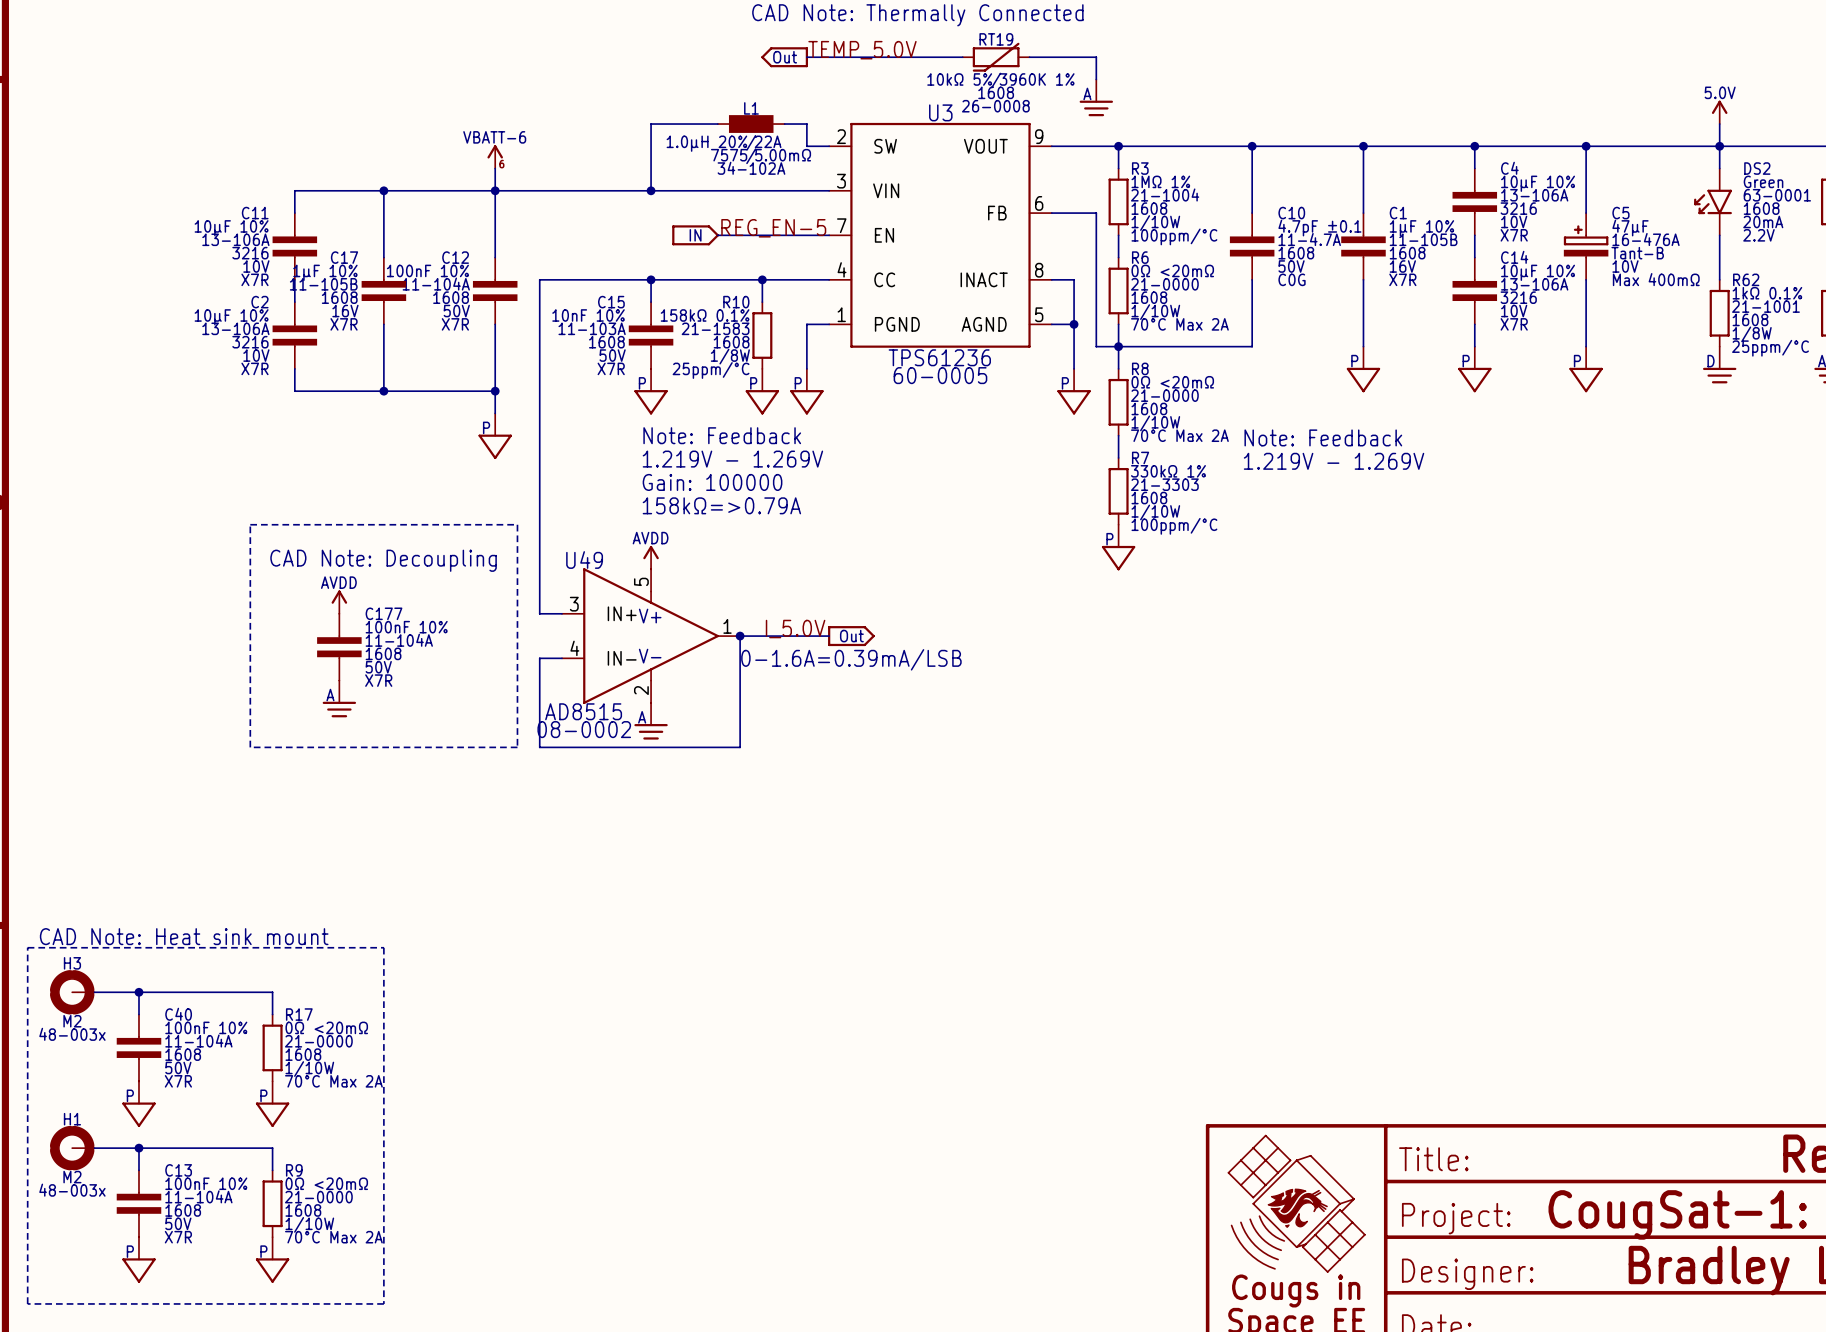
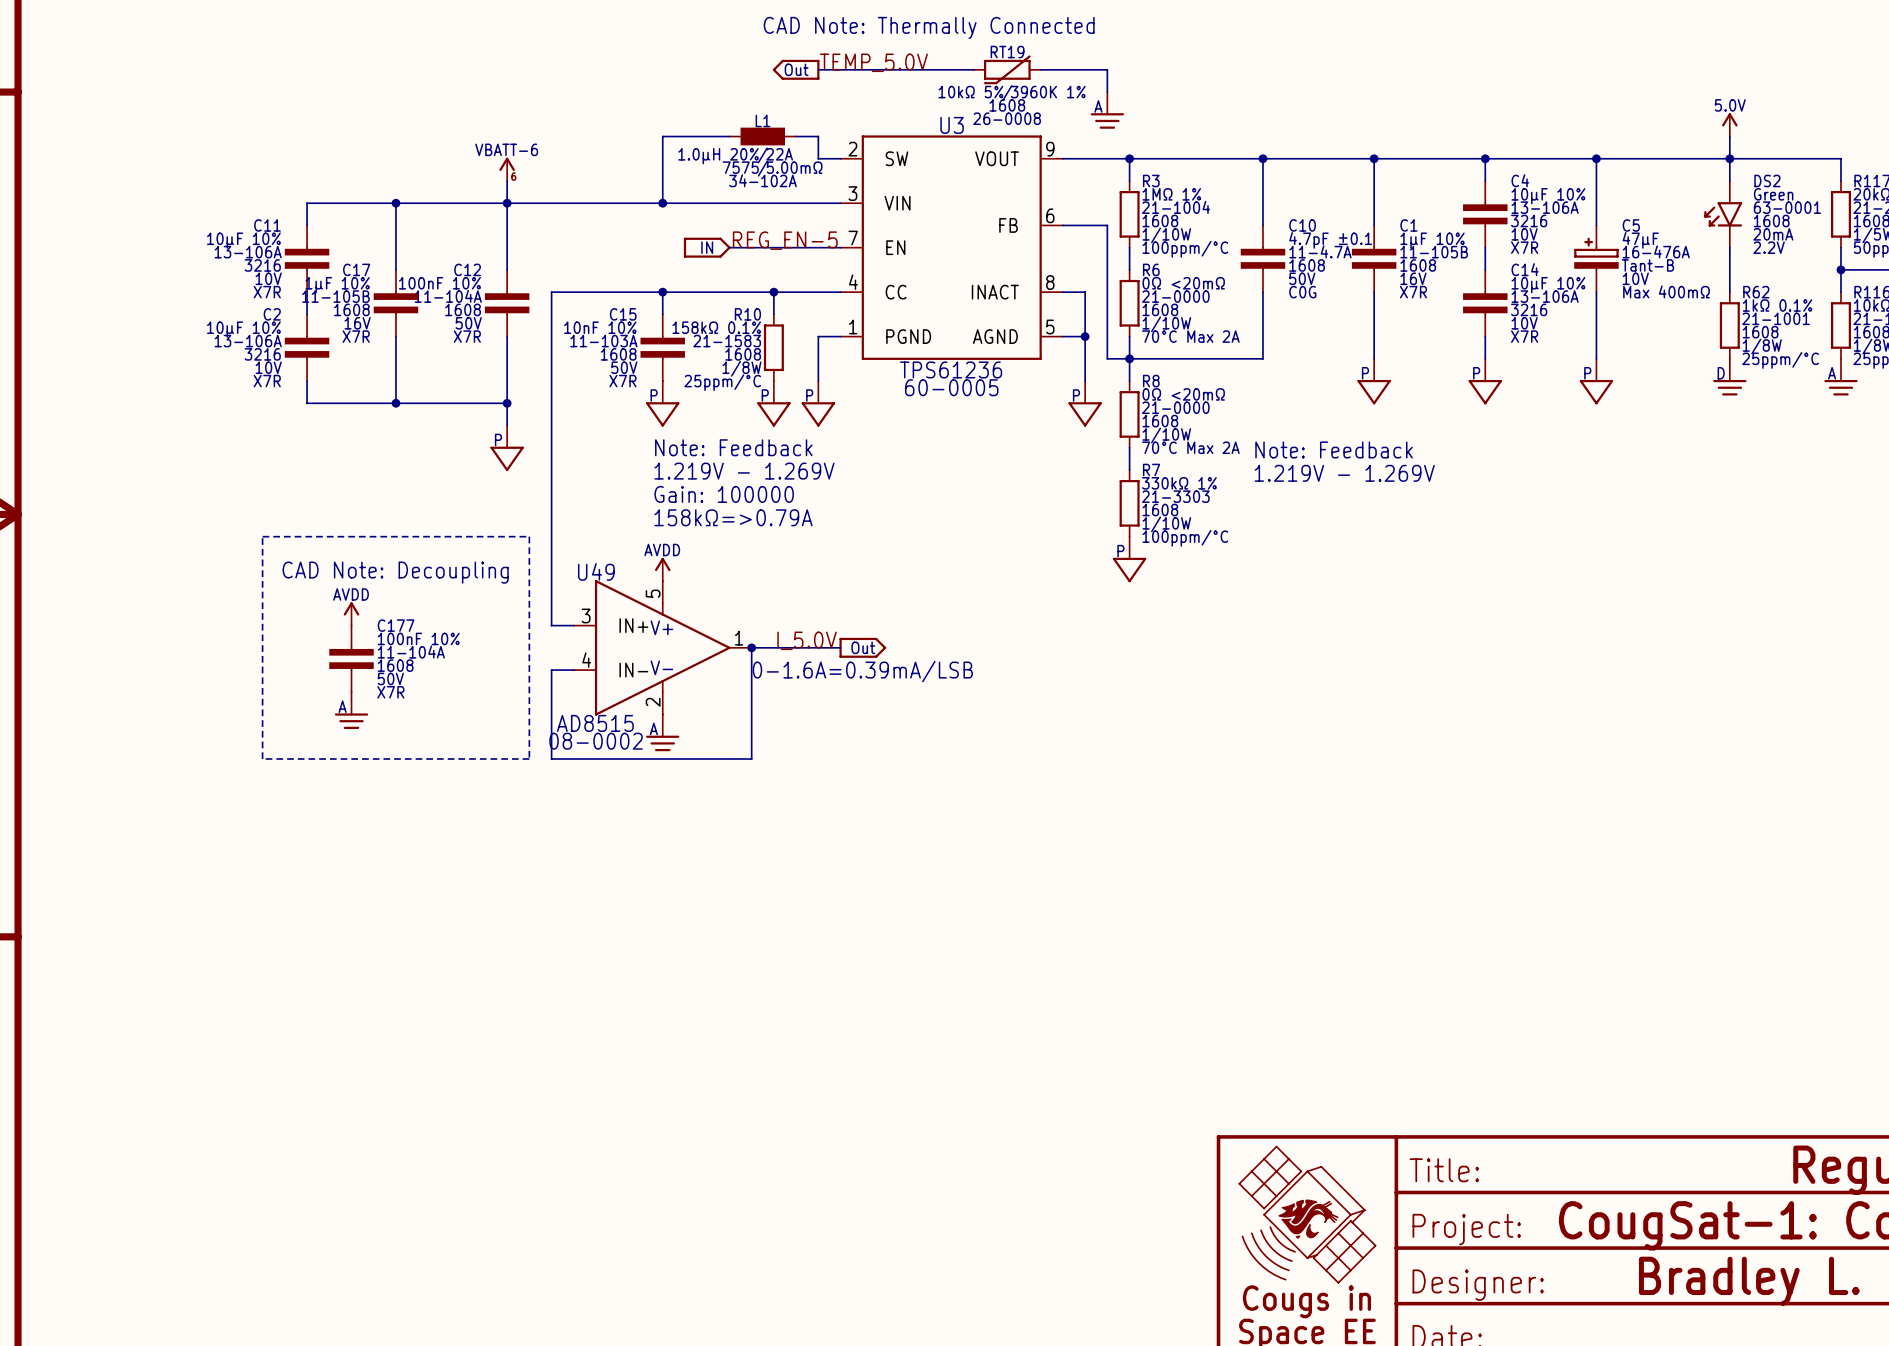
text: CAD Note: Heat sink mount (184, 936) -> none
line: (27, 947) (383, 947) (383, 1303) (27, 1303) (27, 947) -> none
H3: M2 (72, 992) -> none
wire: (94, 992) (272, 992) (272, 1014) -> none
wire: (138, 992) (138, 1014) -> none
junction: (138, 992) -> none
C40: 100nF 10% (138, 1047) -> none
R17: 0Ω <20mΩ (272, 1047) -> none
power symbol: (138, 1104) -> none
power symbol: (272, 1104) -> none
H1: M2 (72, 1148) -> none
wire: (94, 1148) (272, 1148) (272, 1170) -> none
wire: (138, 1148) (138, 1170) -> none
junction: (138, 1148) -> none
C13: 100nF 10% (138, 1203) -> none
R9: 0Ω <20mΩ (272, 1203) -> none
power symbol: (138, 1260) -> none
power symbol: (272, 1260) -> none

